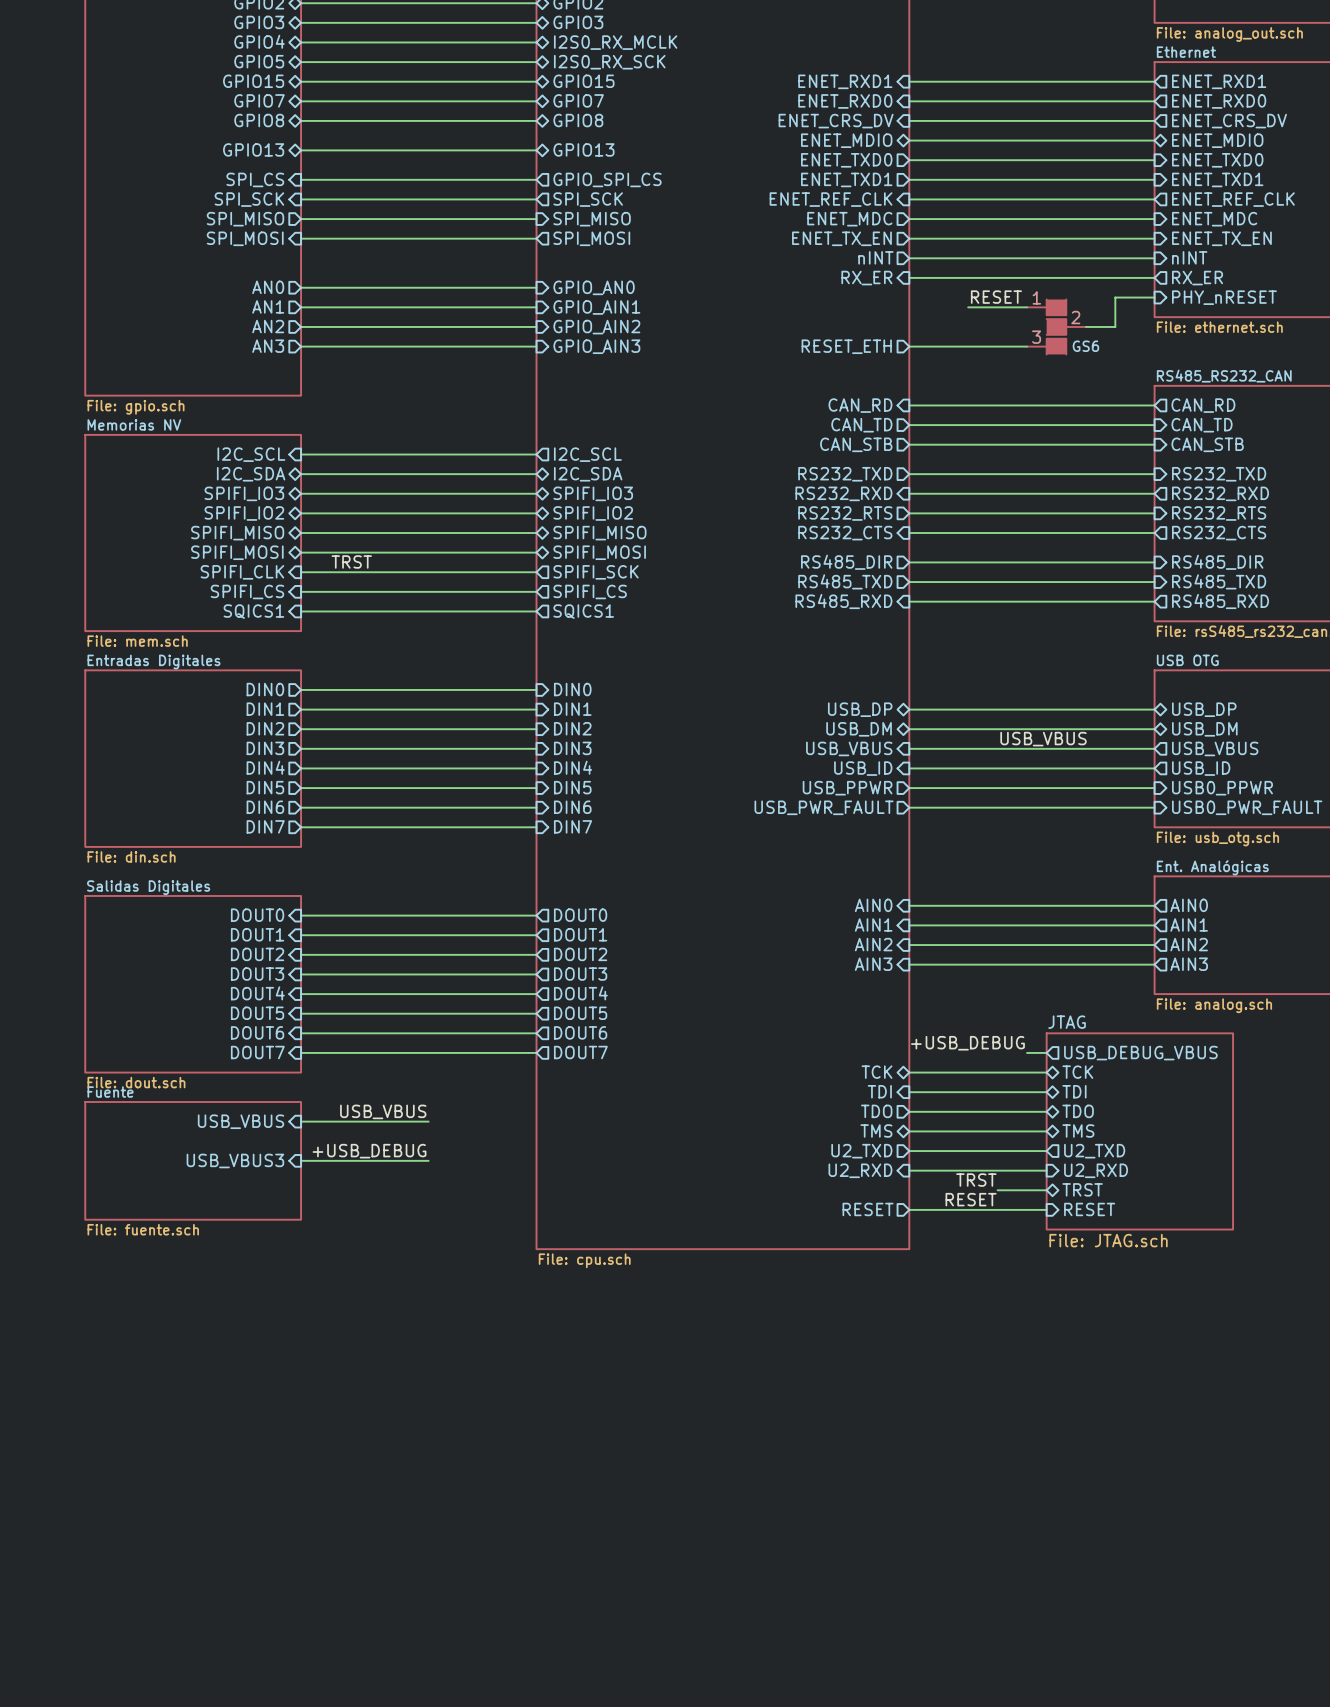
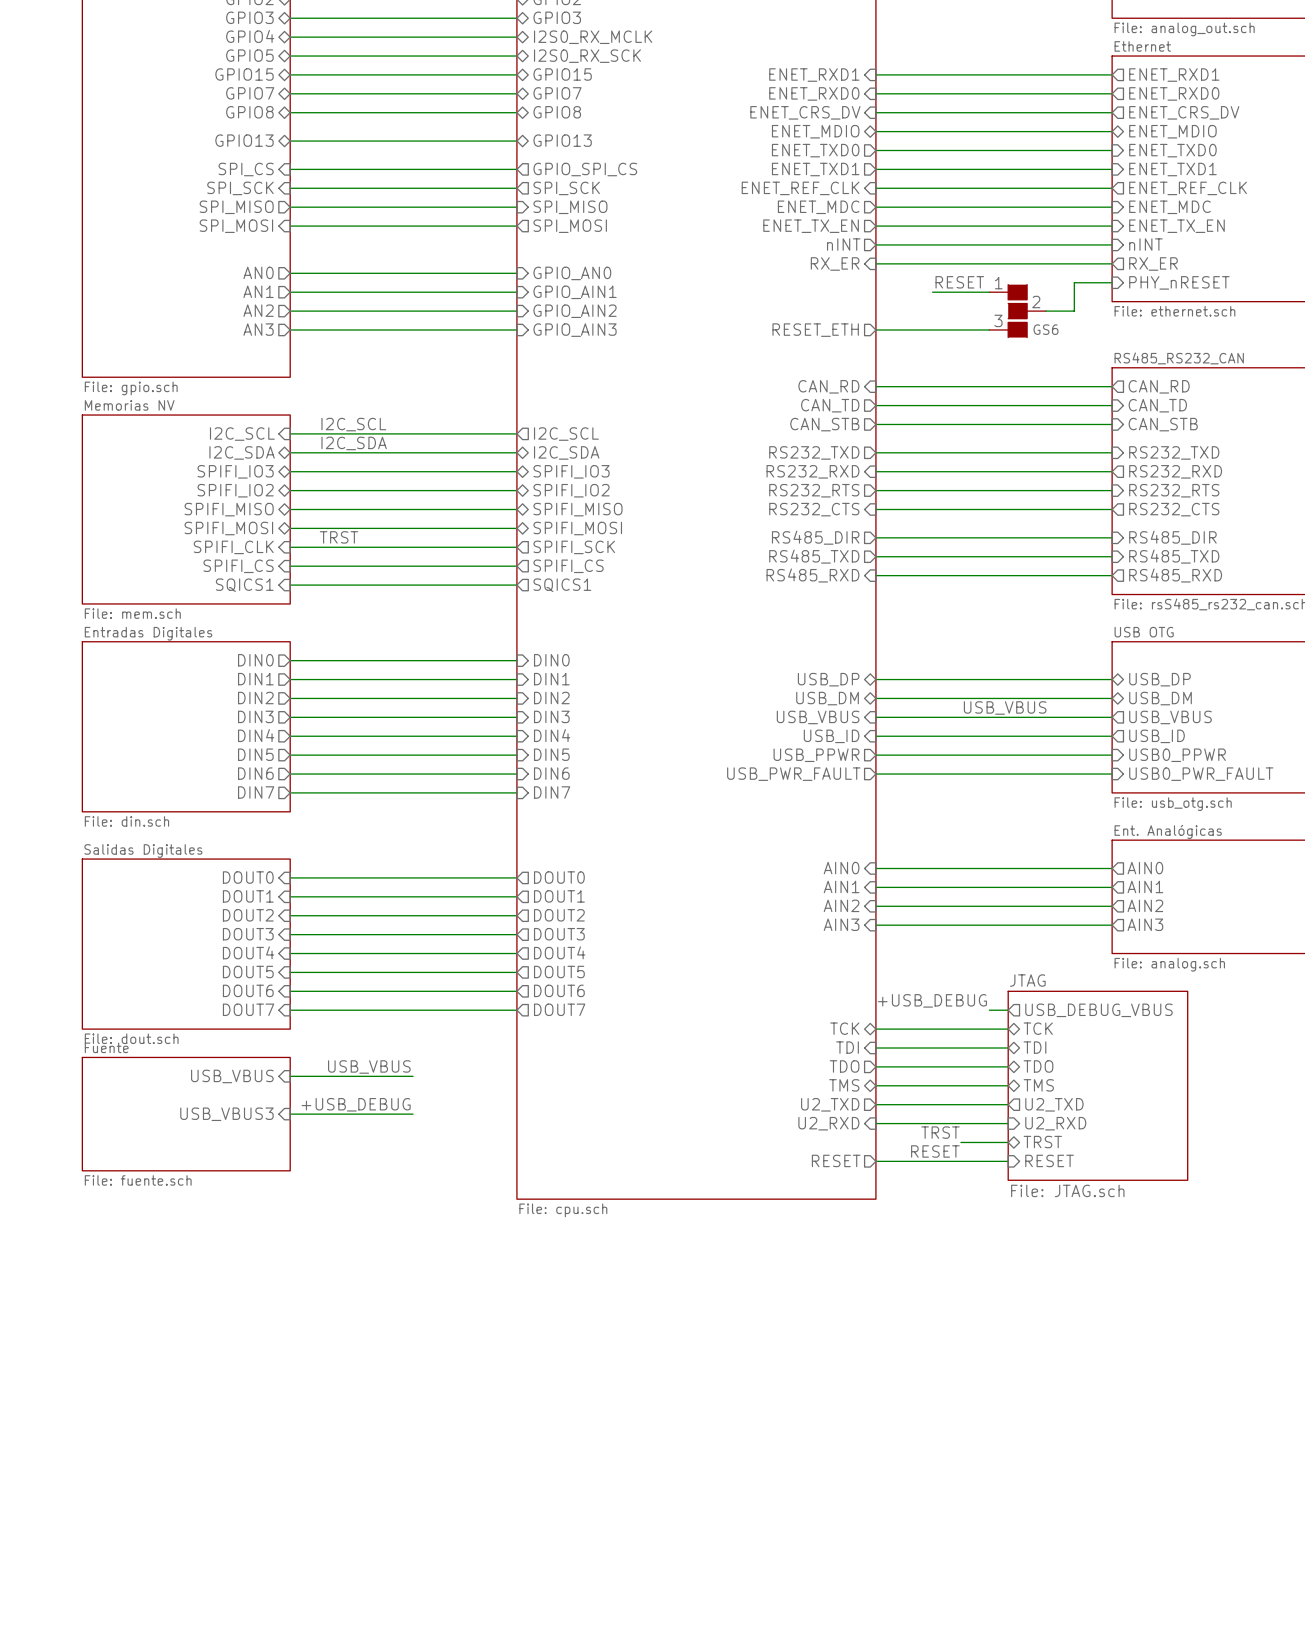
label: none -> I2C_SCL (353, 424)
label: none -> I2C_SDA (354, 443)

